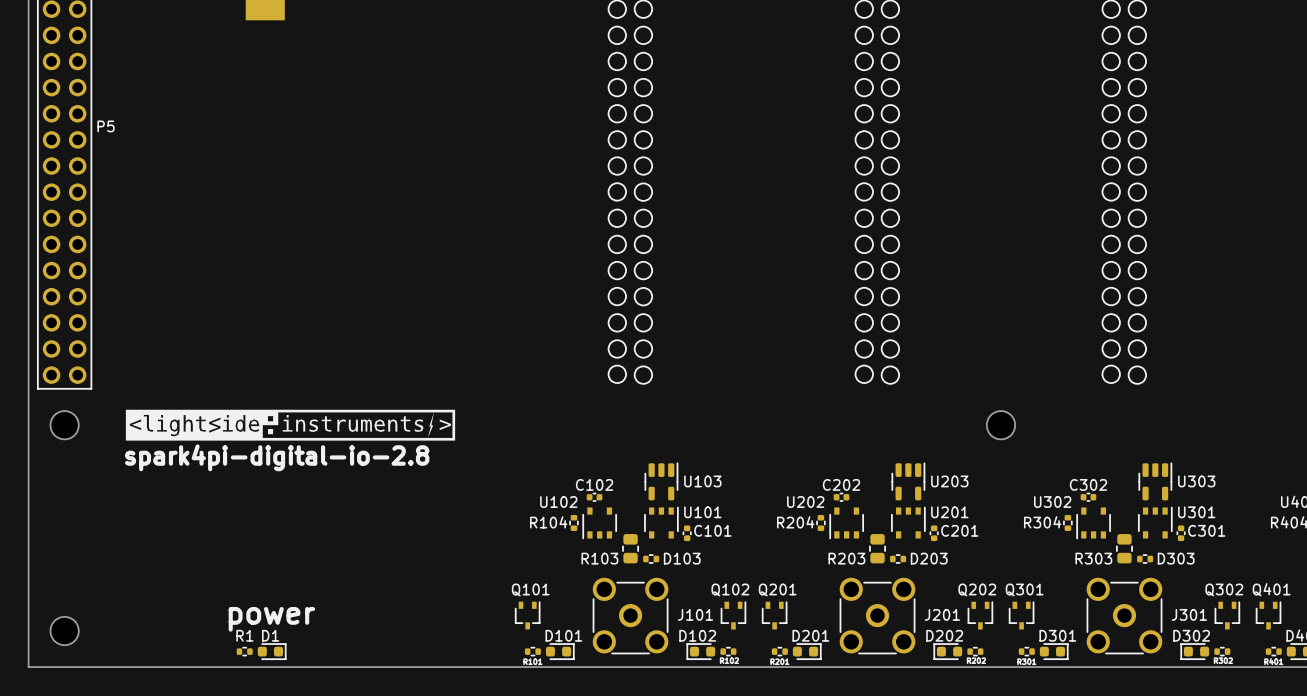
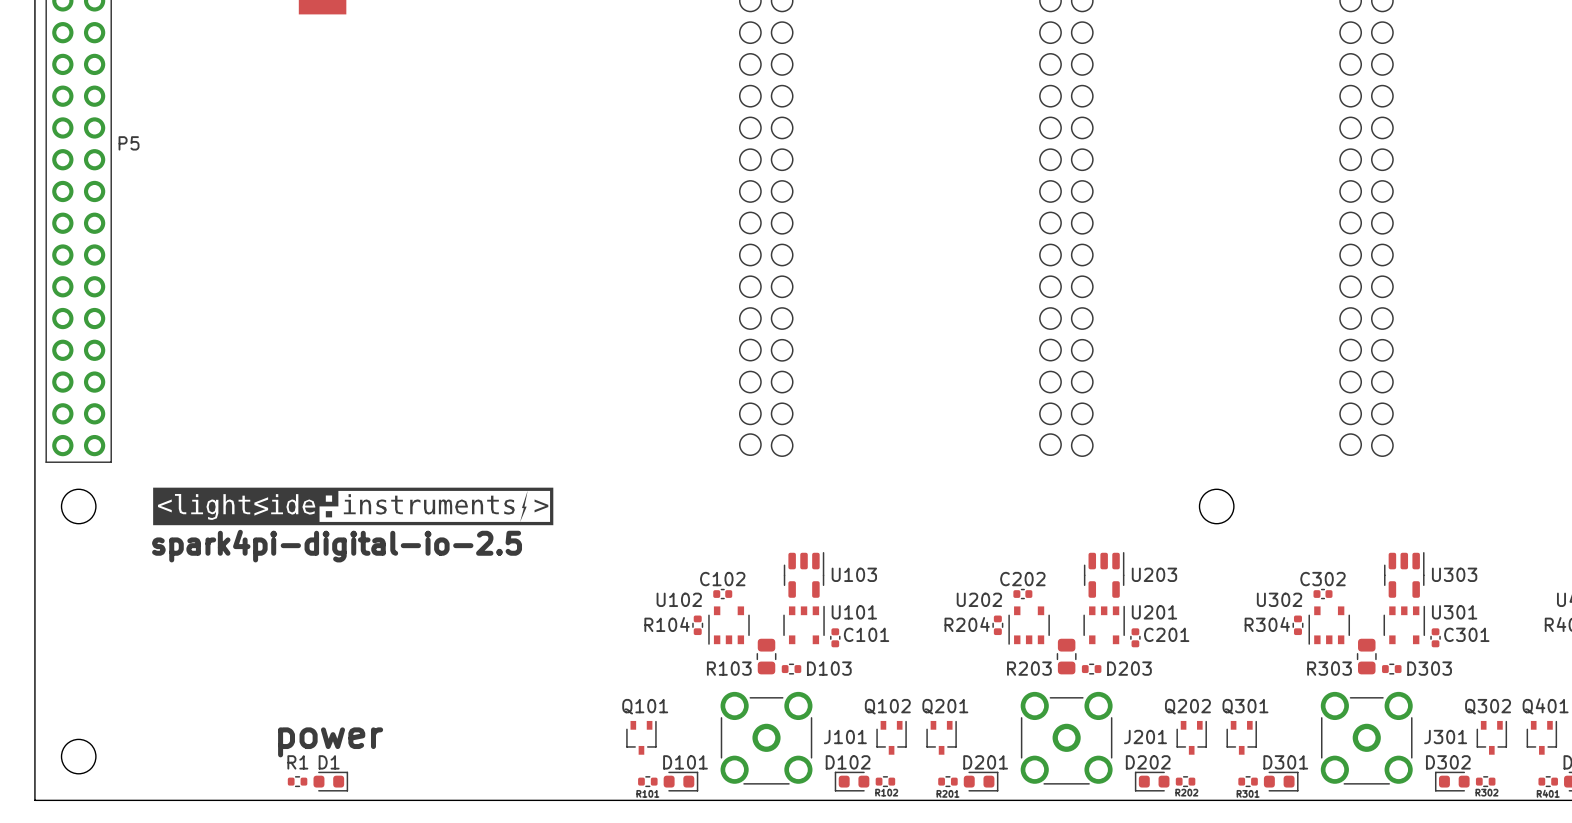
text: spark4pi-digital-io-2.8 (277, 457) -> spark4pi-digital-io-2.5 (337, 546)

